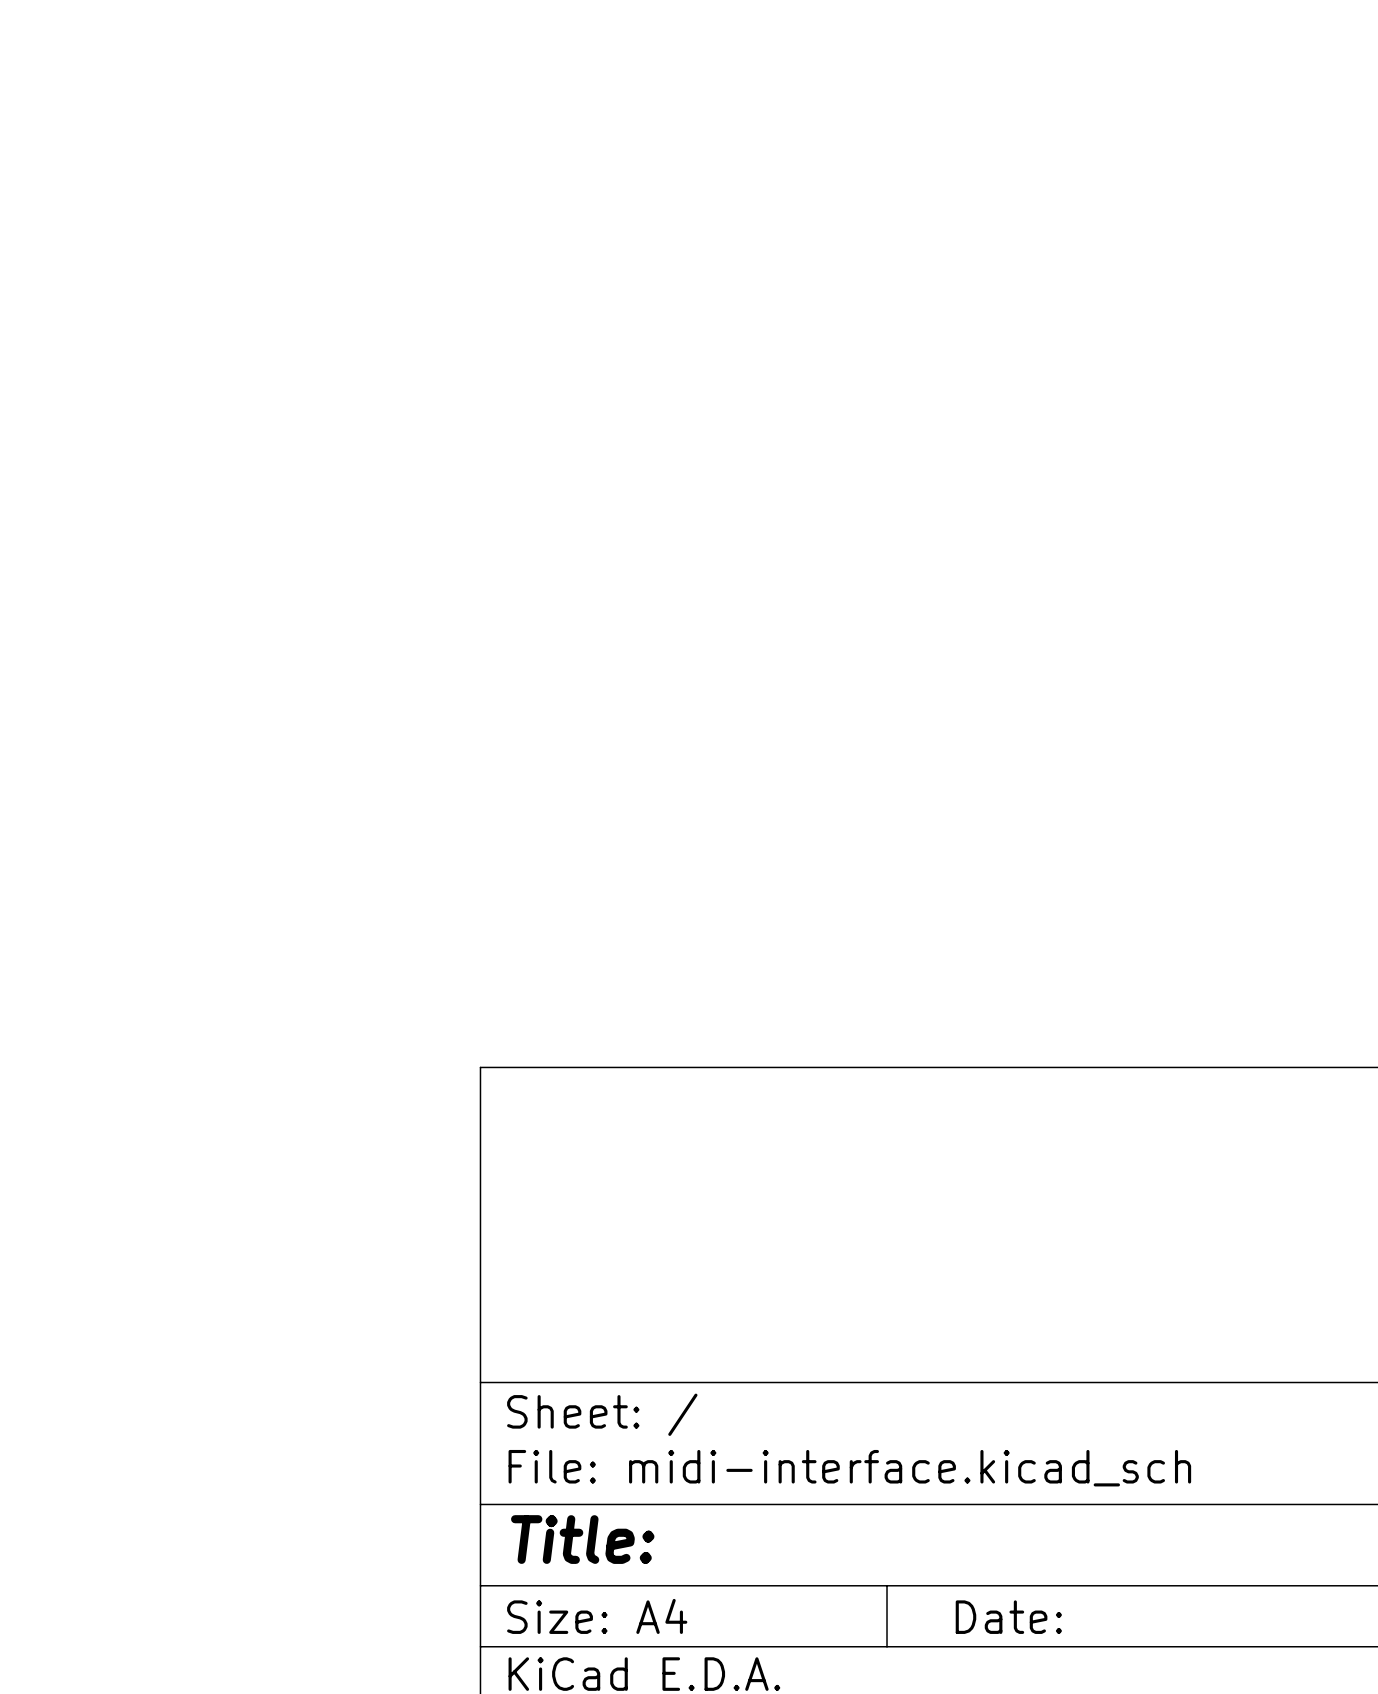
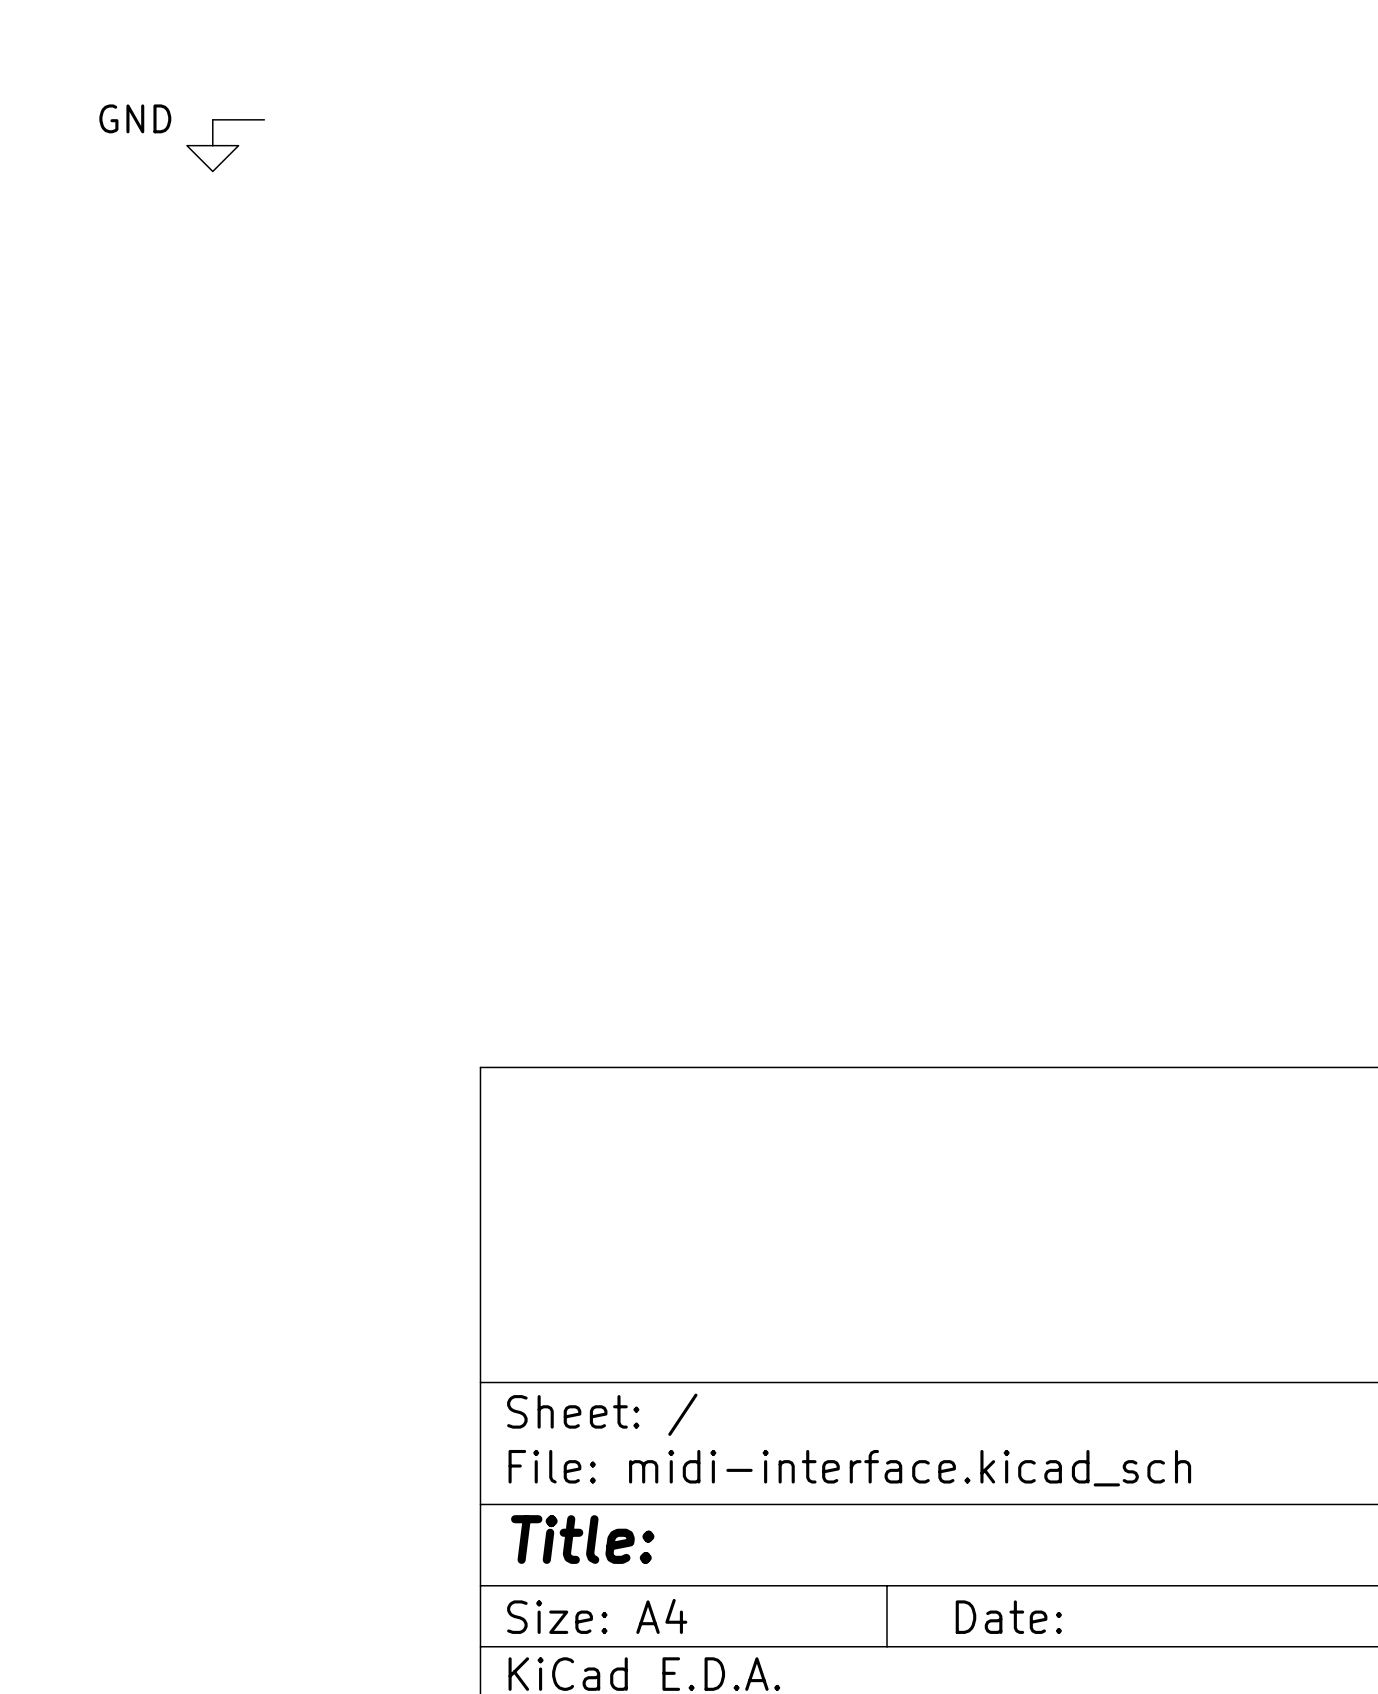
wire: none -> (212, 119) (264, 119)
power symbol: none -> GND (212, 145)

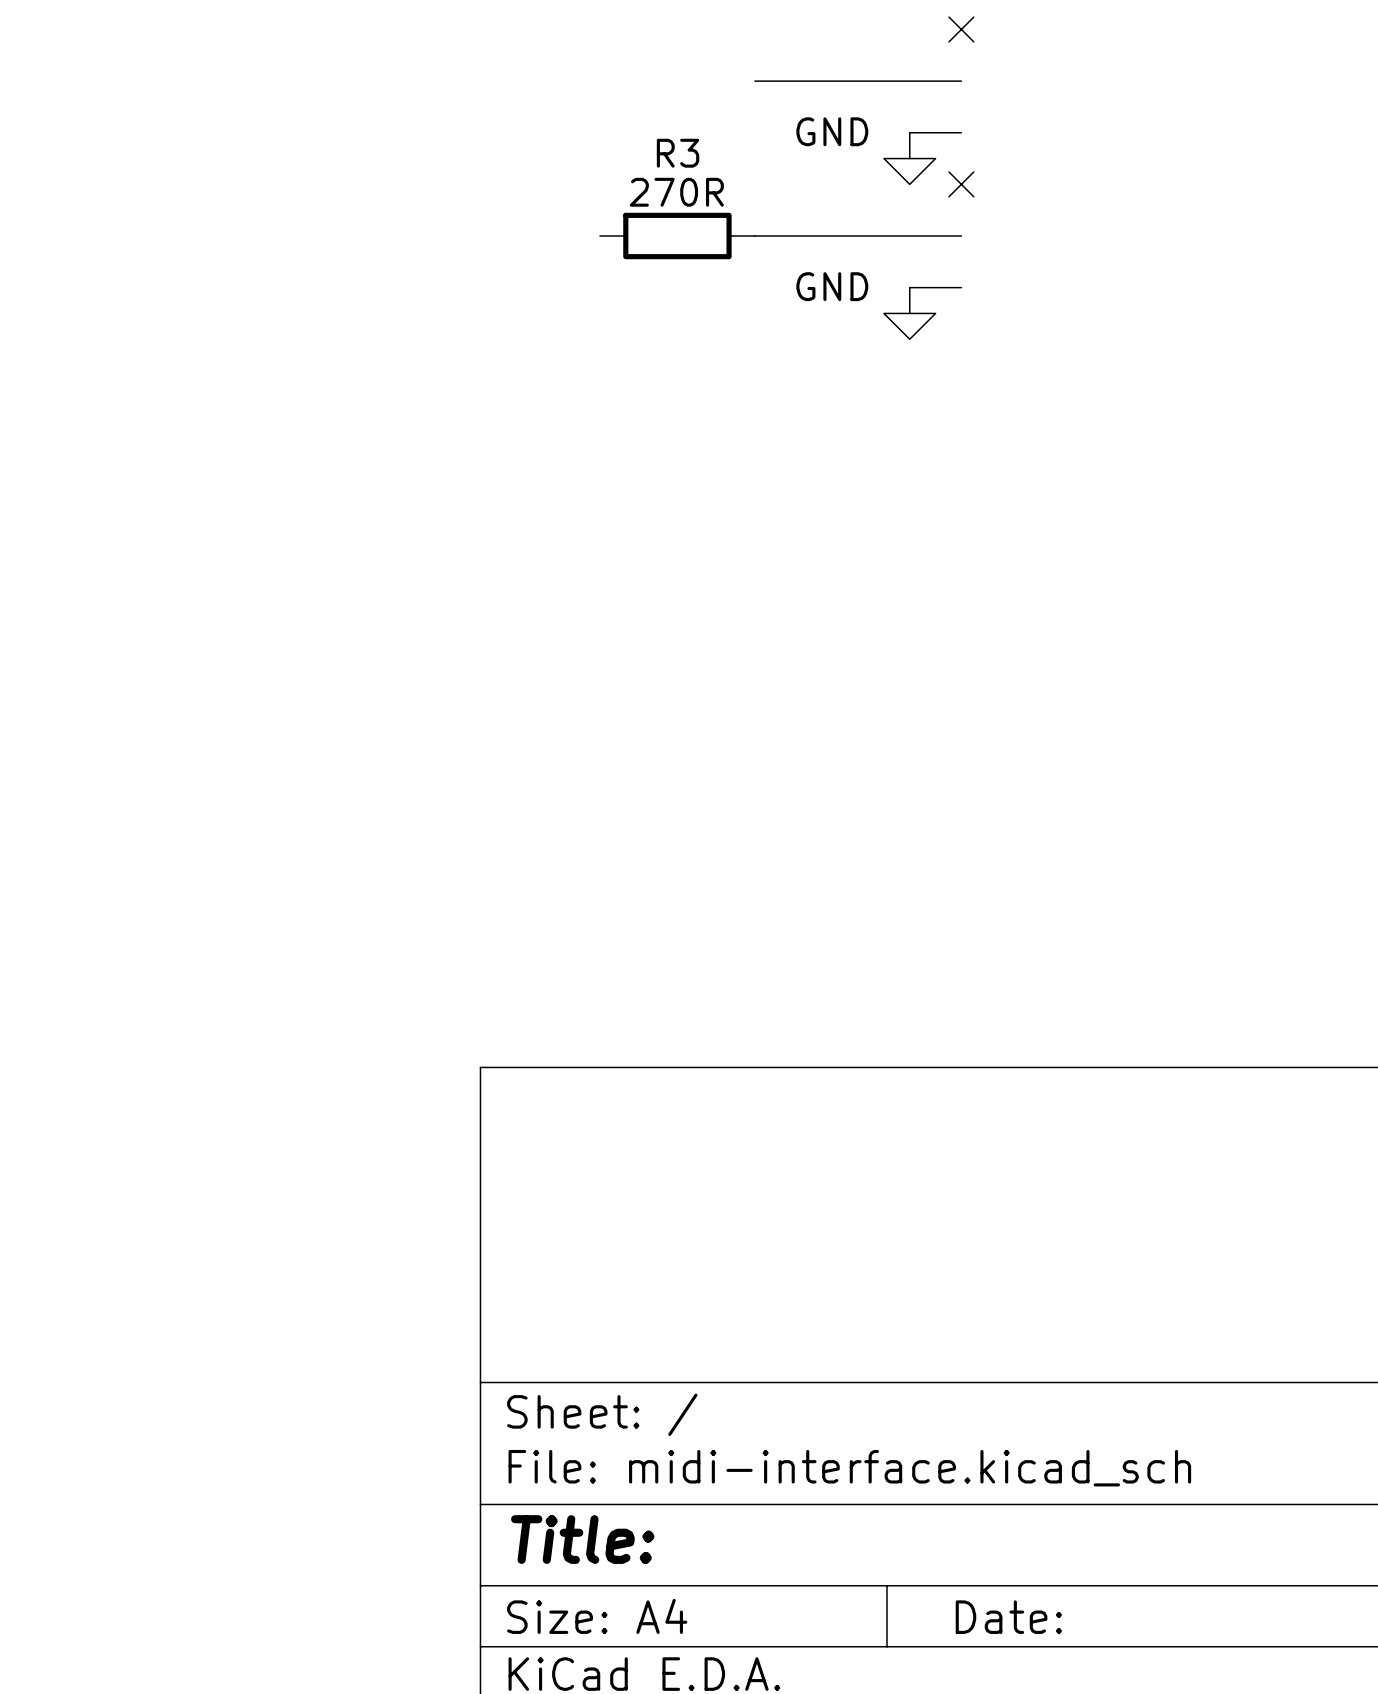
no-connect mark: none -> (961, 29)
wire: none -> (754, 81) (961, 81)
wire: (212, 119) (264, 119) -> none
wire: none -> (909, 132) (961, 132)
power symbol: GND (212, 145) -> none
power symbol: none -> GND (909, 158)
no-connect mark: none -> (961, 184)
R3: none -> 270R (677, 236)
wire: none -> (754, 236) (961, 236)
wire: none -> (909, 287) (961, 287)
power symbol: none -> GND (909, 313)

